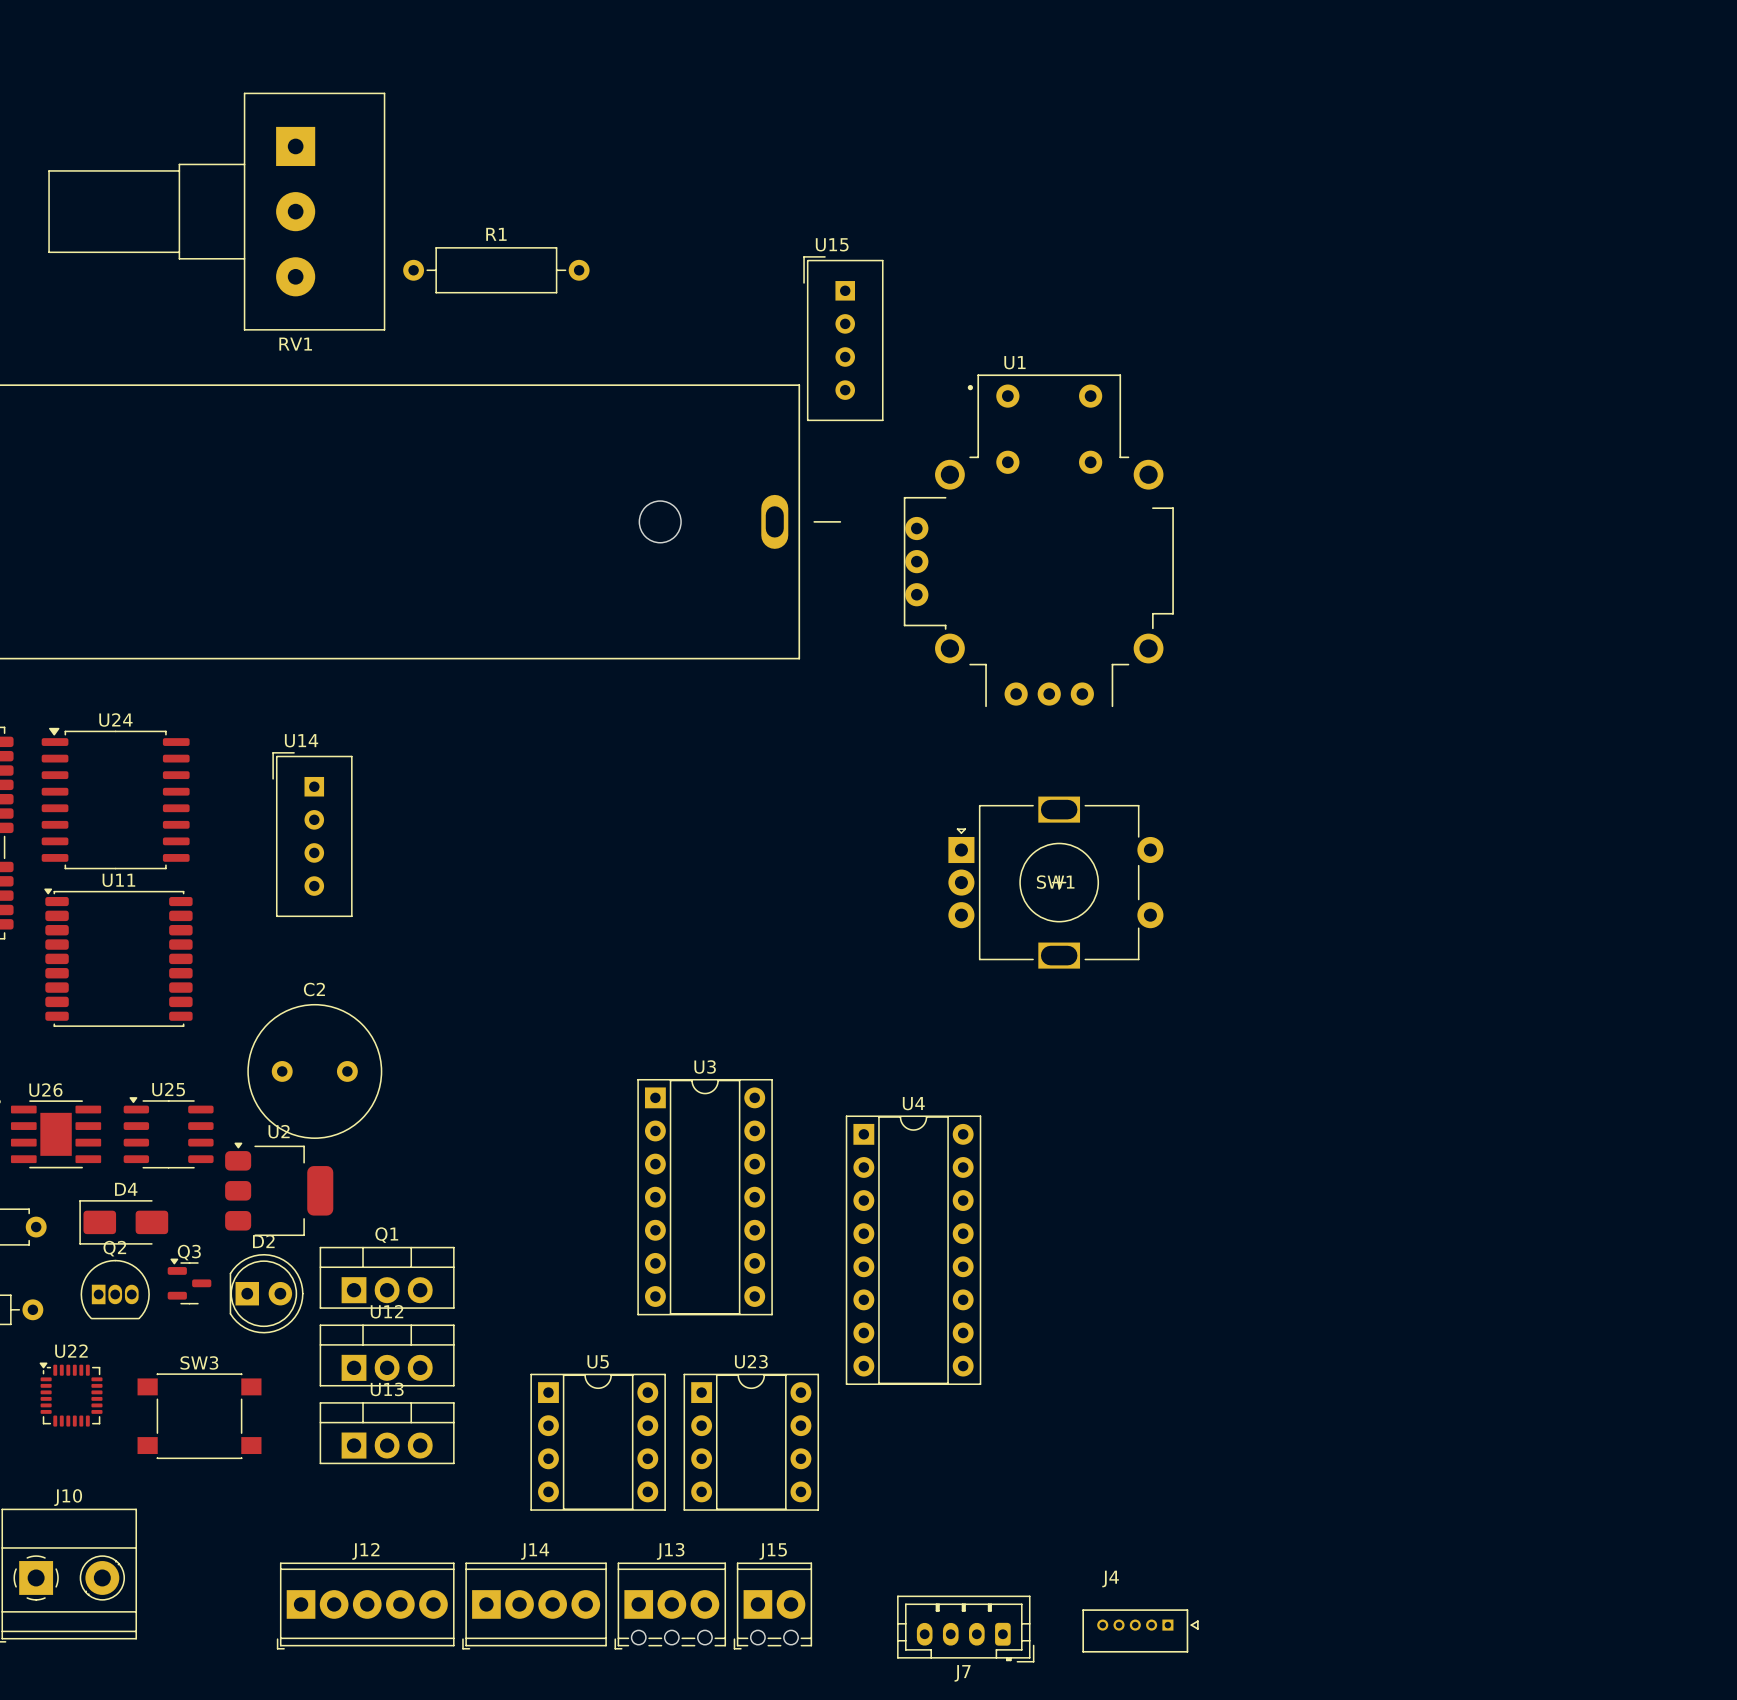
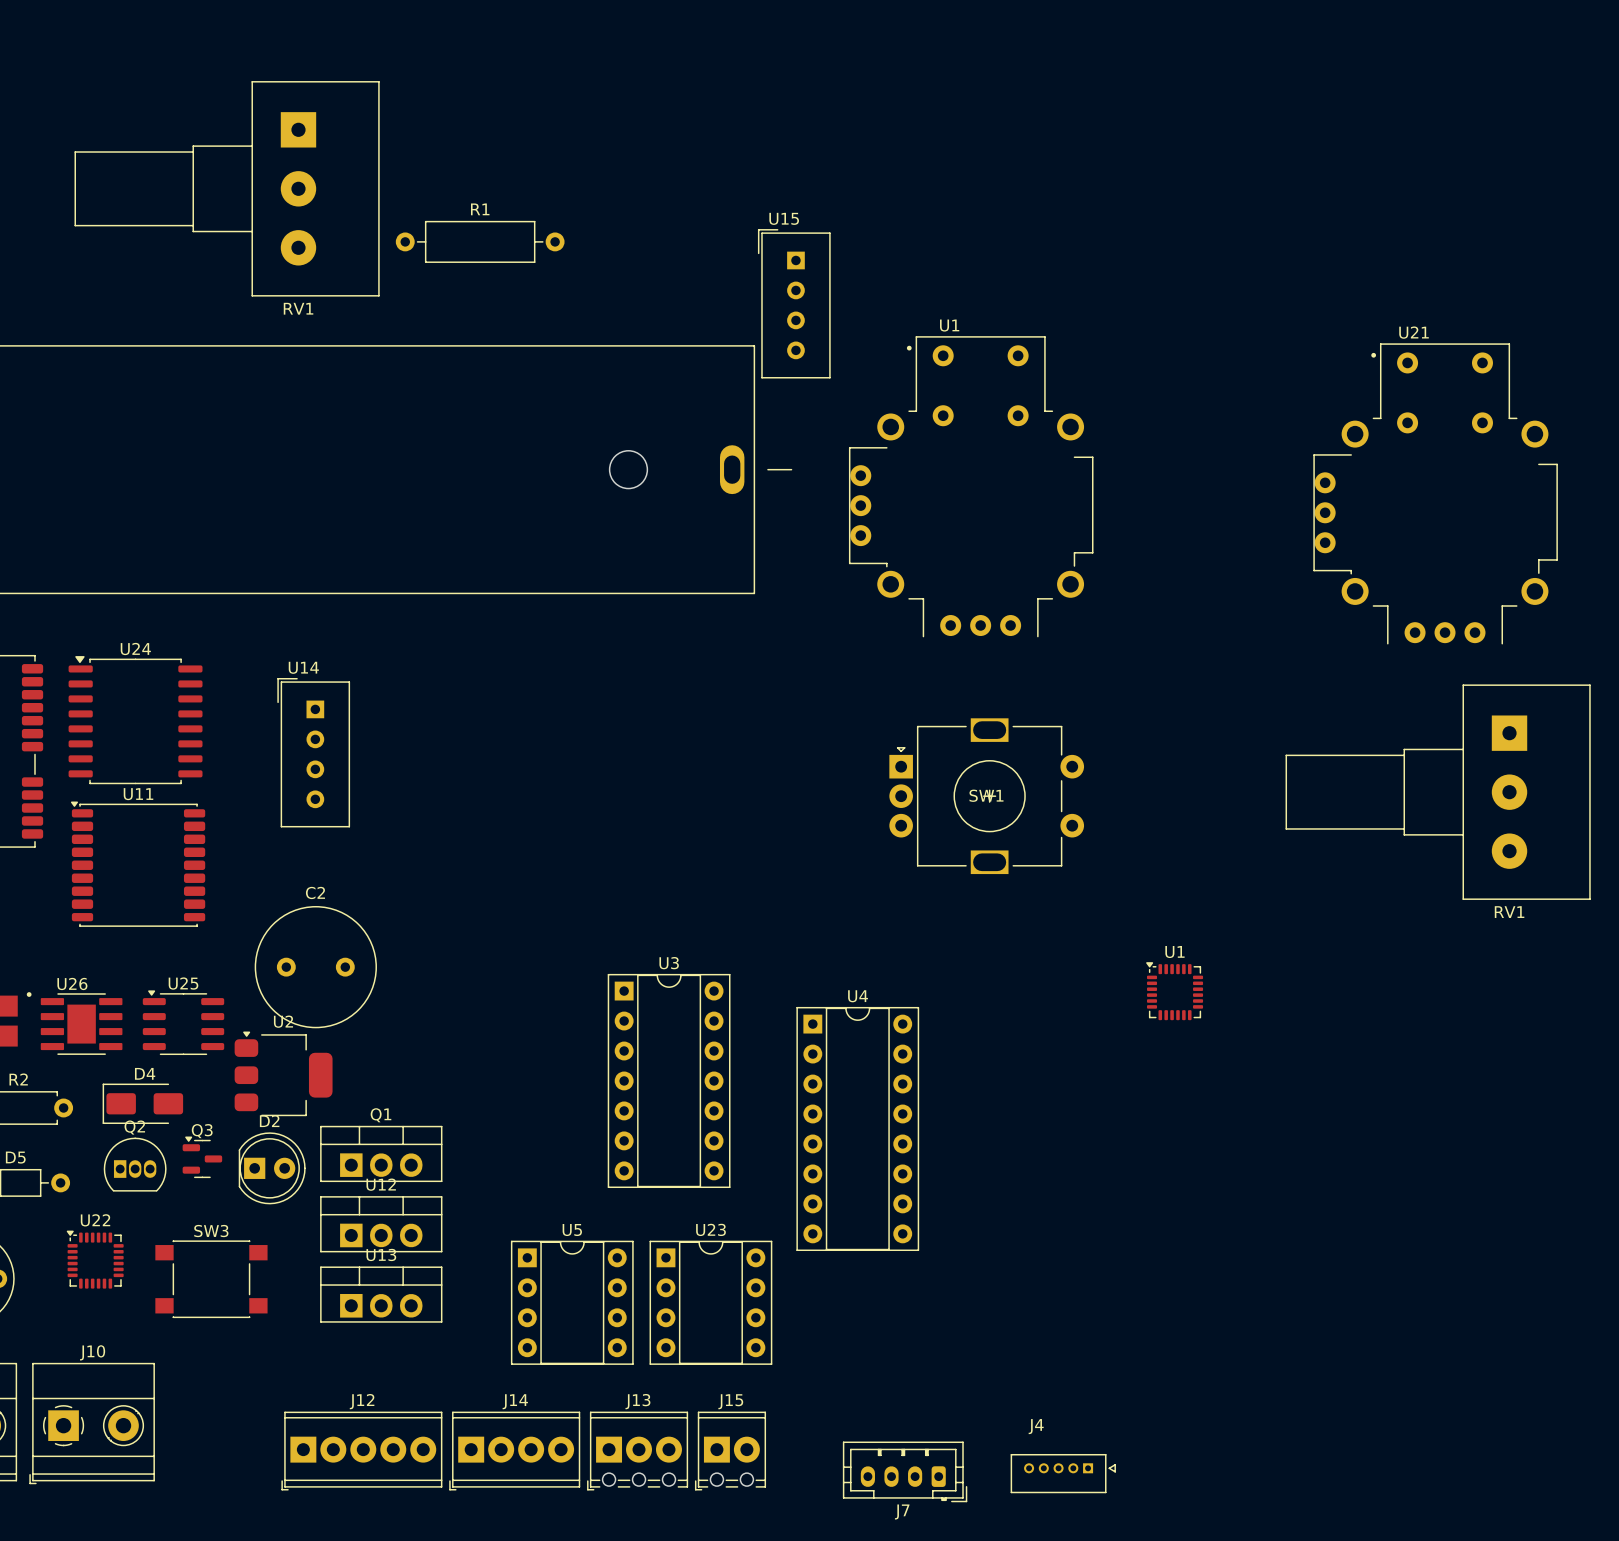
U21: none -> (1435, 493)
RV1: none -> (1438, 792)
U1: none -> (1174, 991)

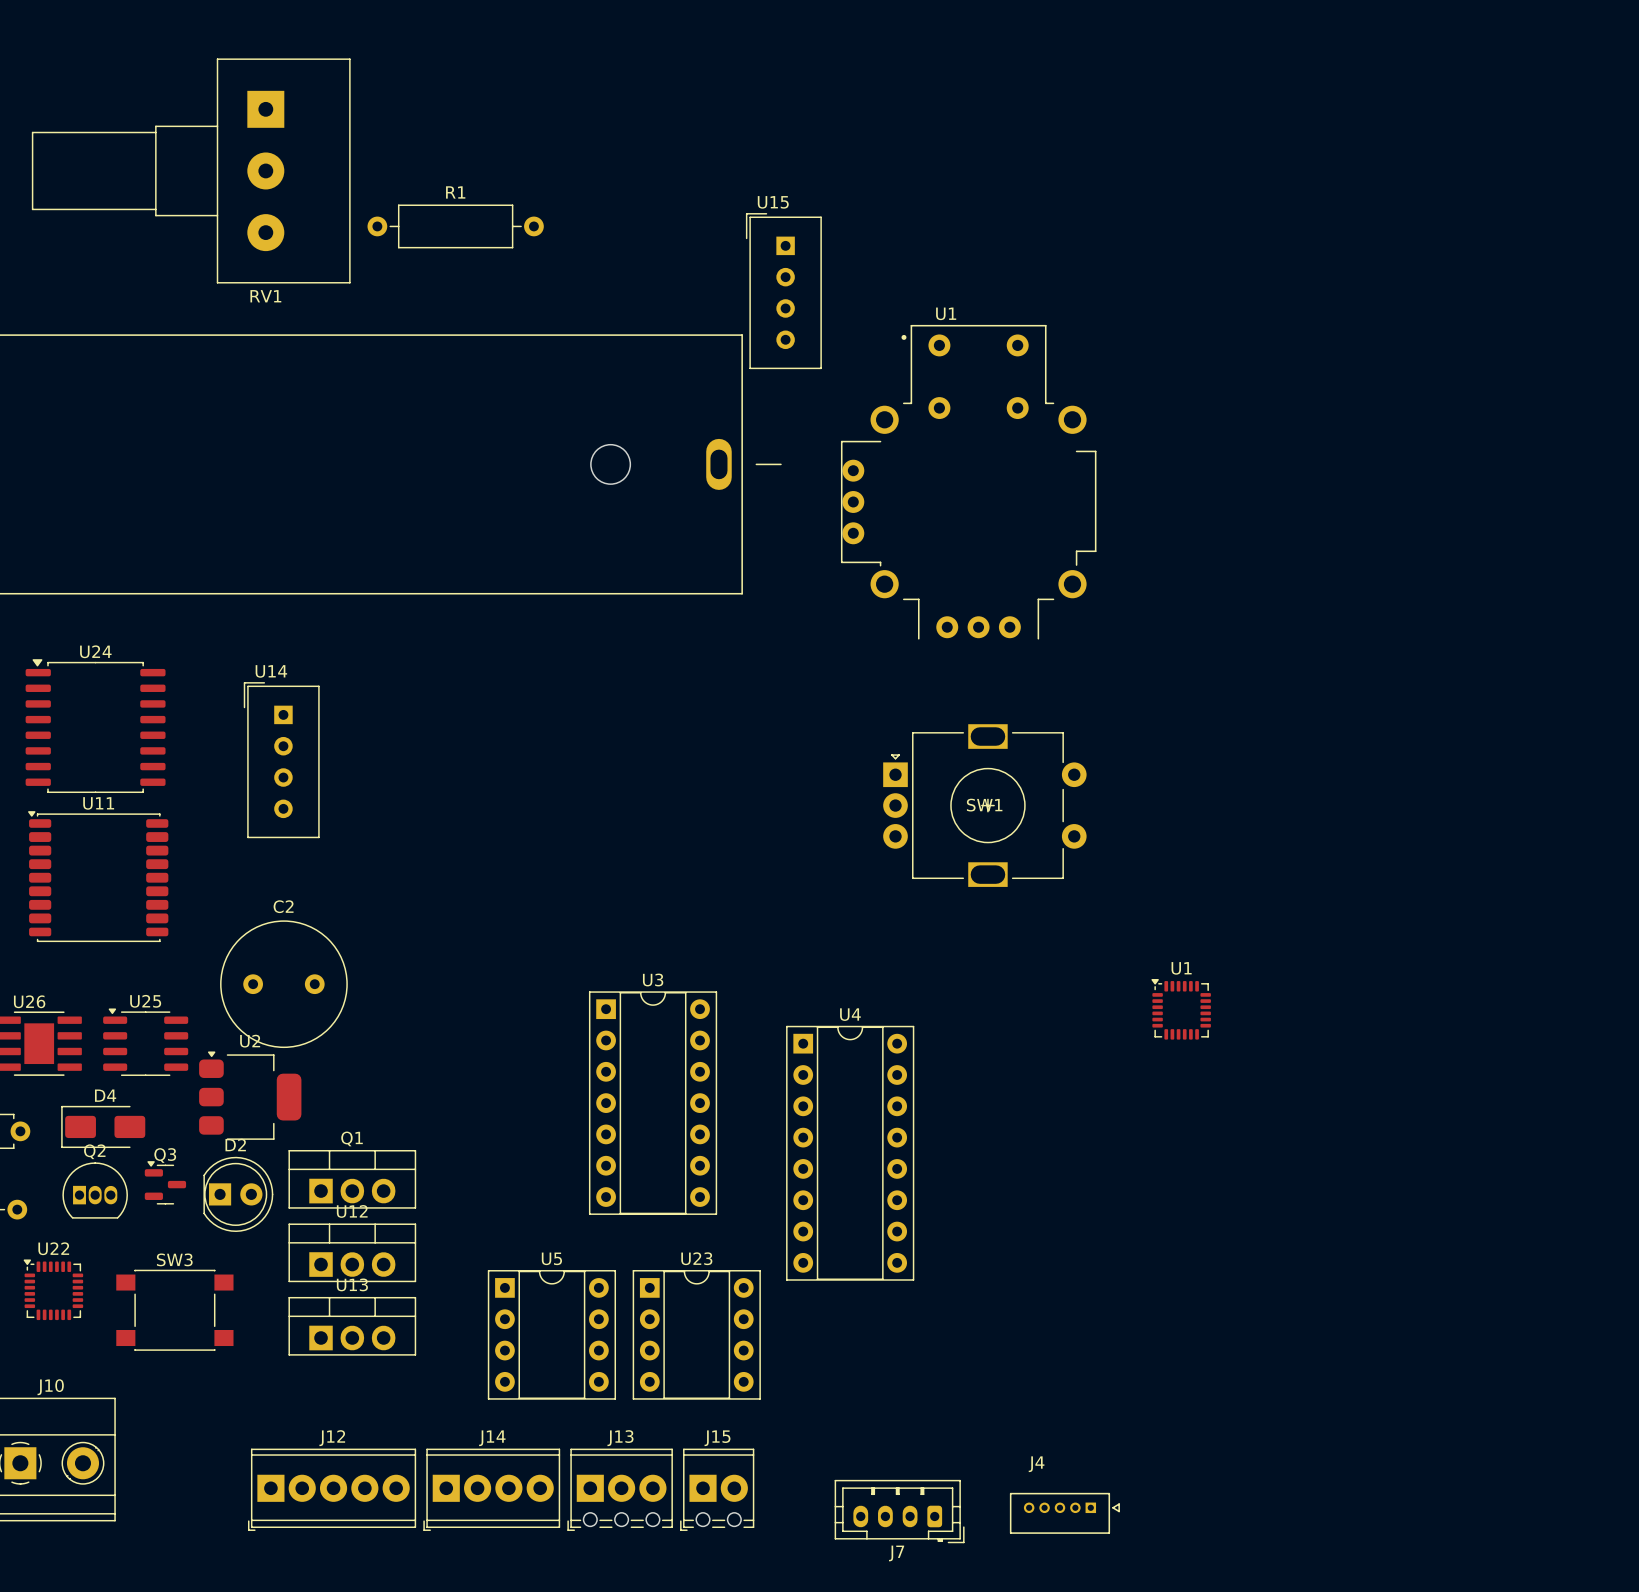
U21: (1435, 493) -> none
RV1: (1438, 792) -> none

